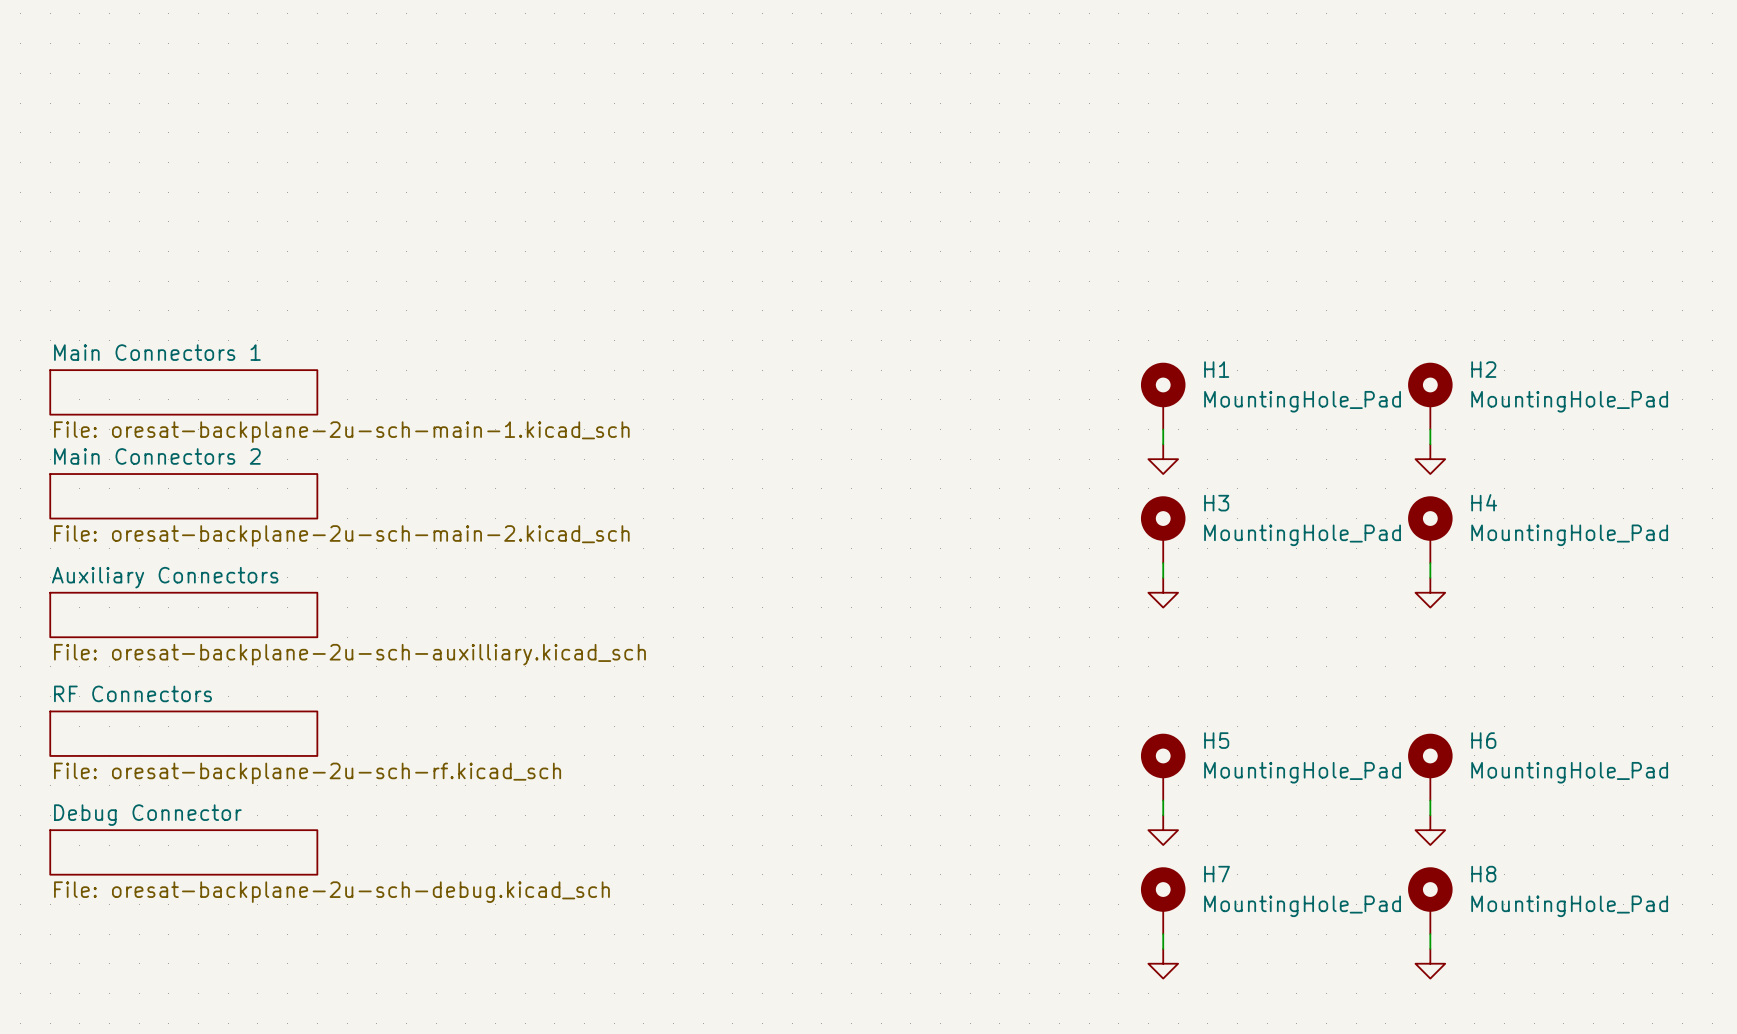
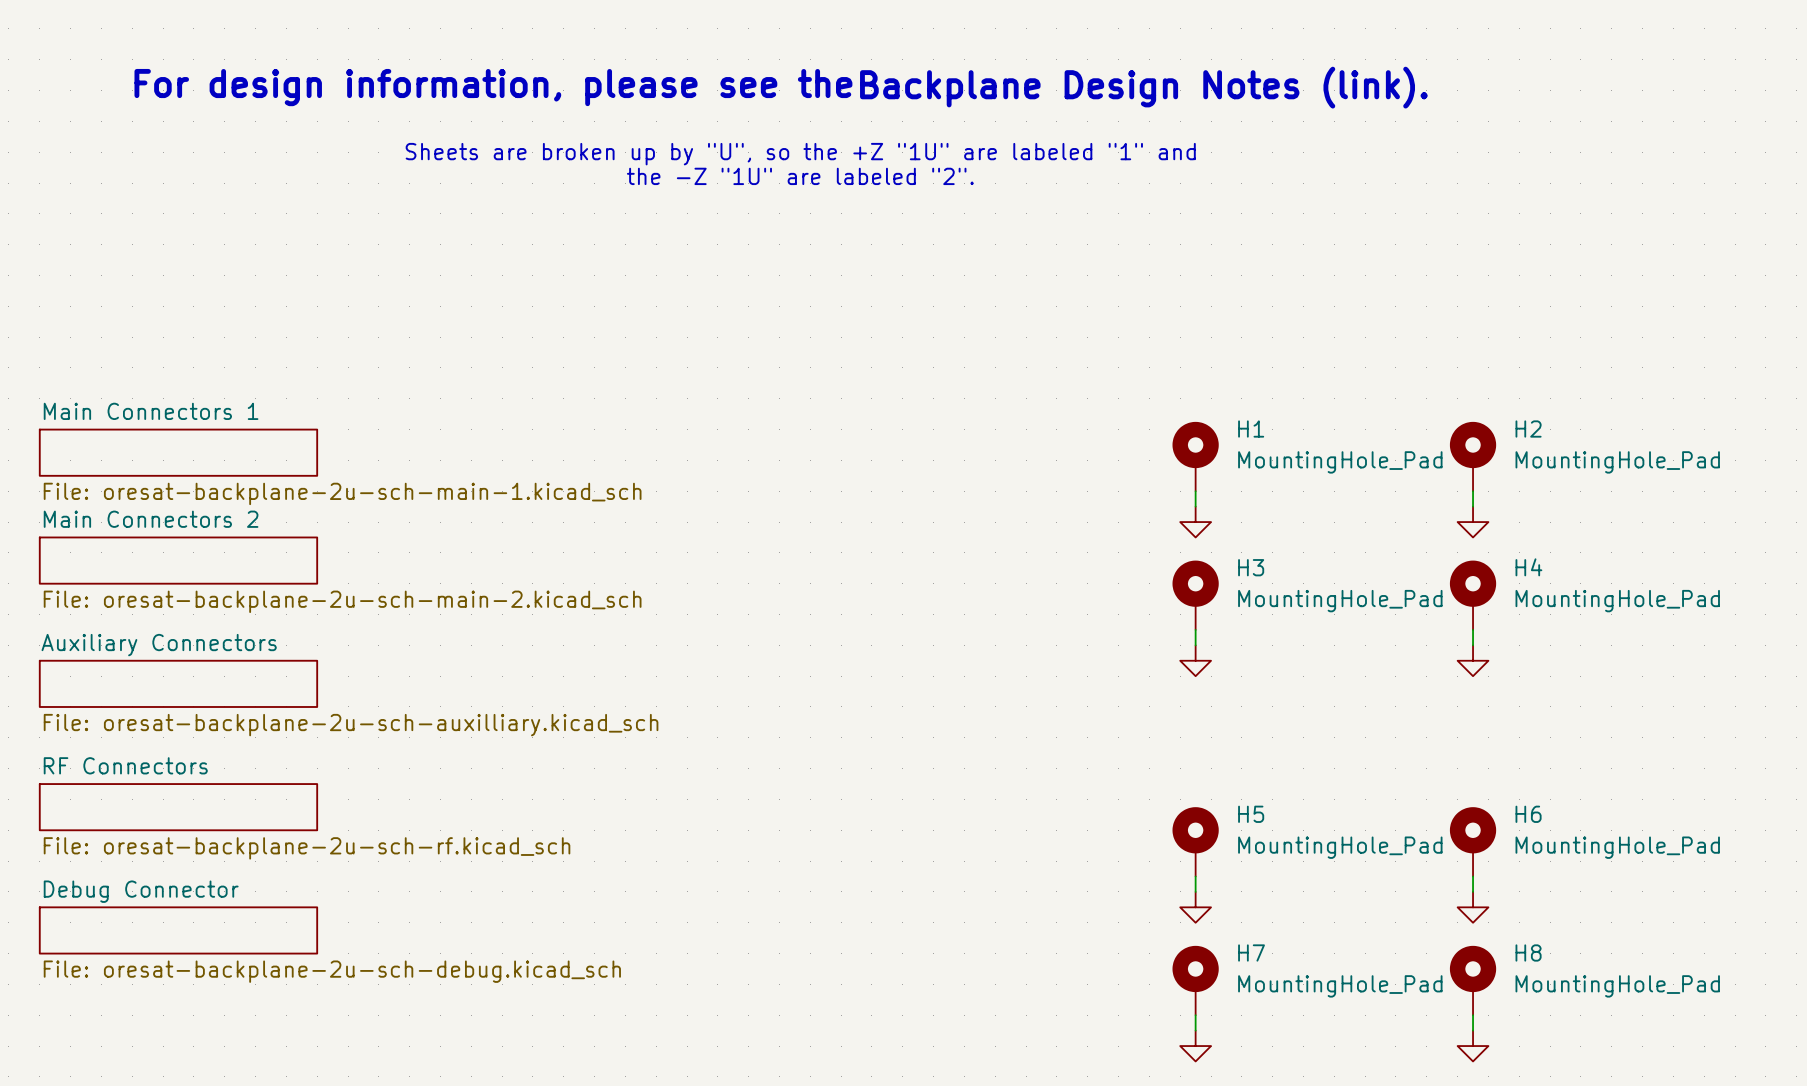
text: none -> For design information, please see the (493, 87)
text: none -> Backplane Design Notes (link). (1143, 87)
text: none -> Sheets are broken up by "U", so the +Z "1U" are labeled "1" and (800, 154)
text: none -> the -Z "1U" are labeled "2". (800, 176)

